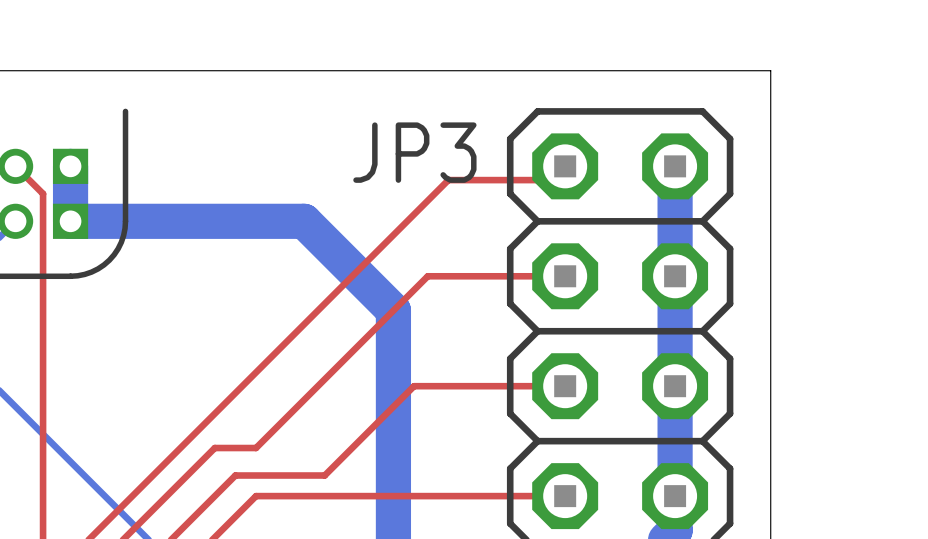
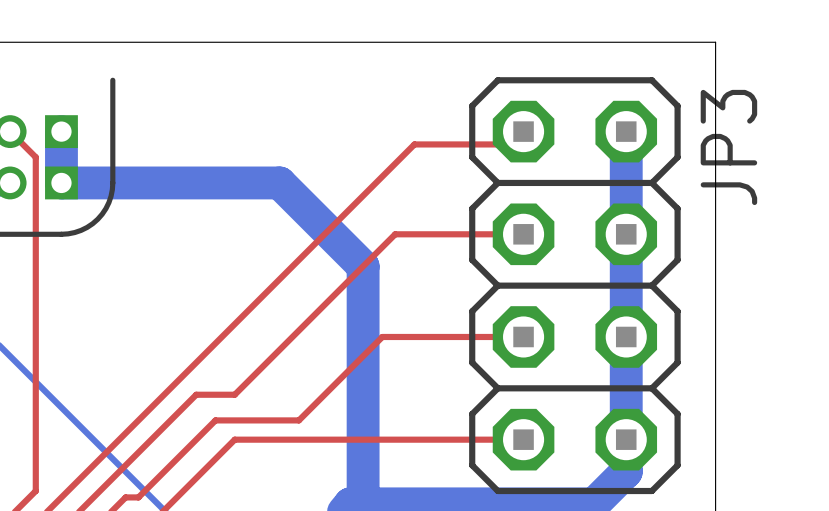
JP3 name rotation: 0° (414, 152) -> 90° counterclockwise (728, 147)
JP3 name position: JP3 (414, 152) -> JP3 (728, 147)

